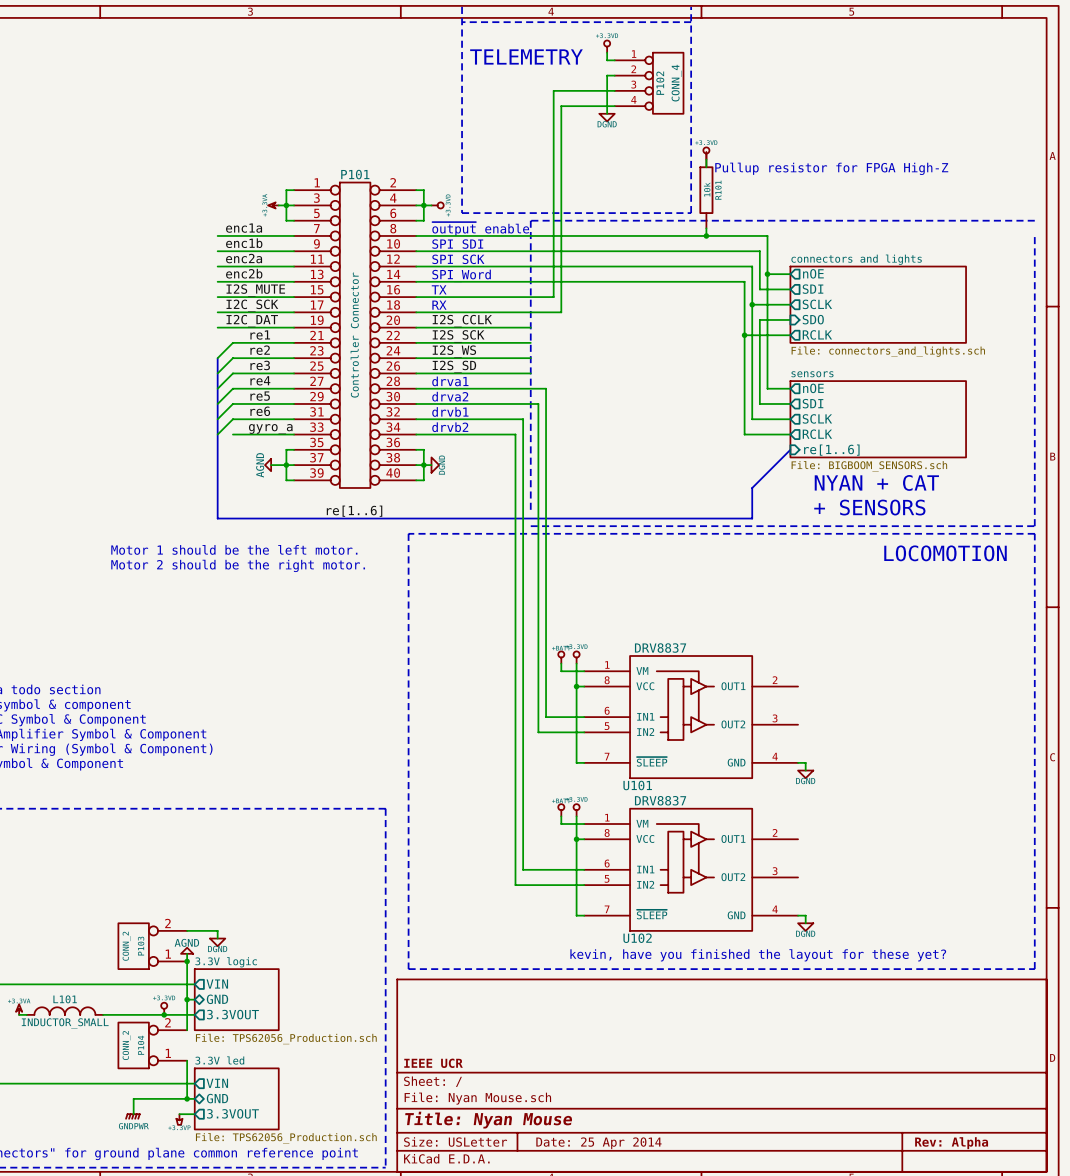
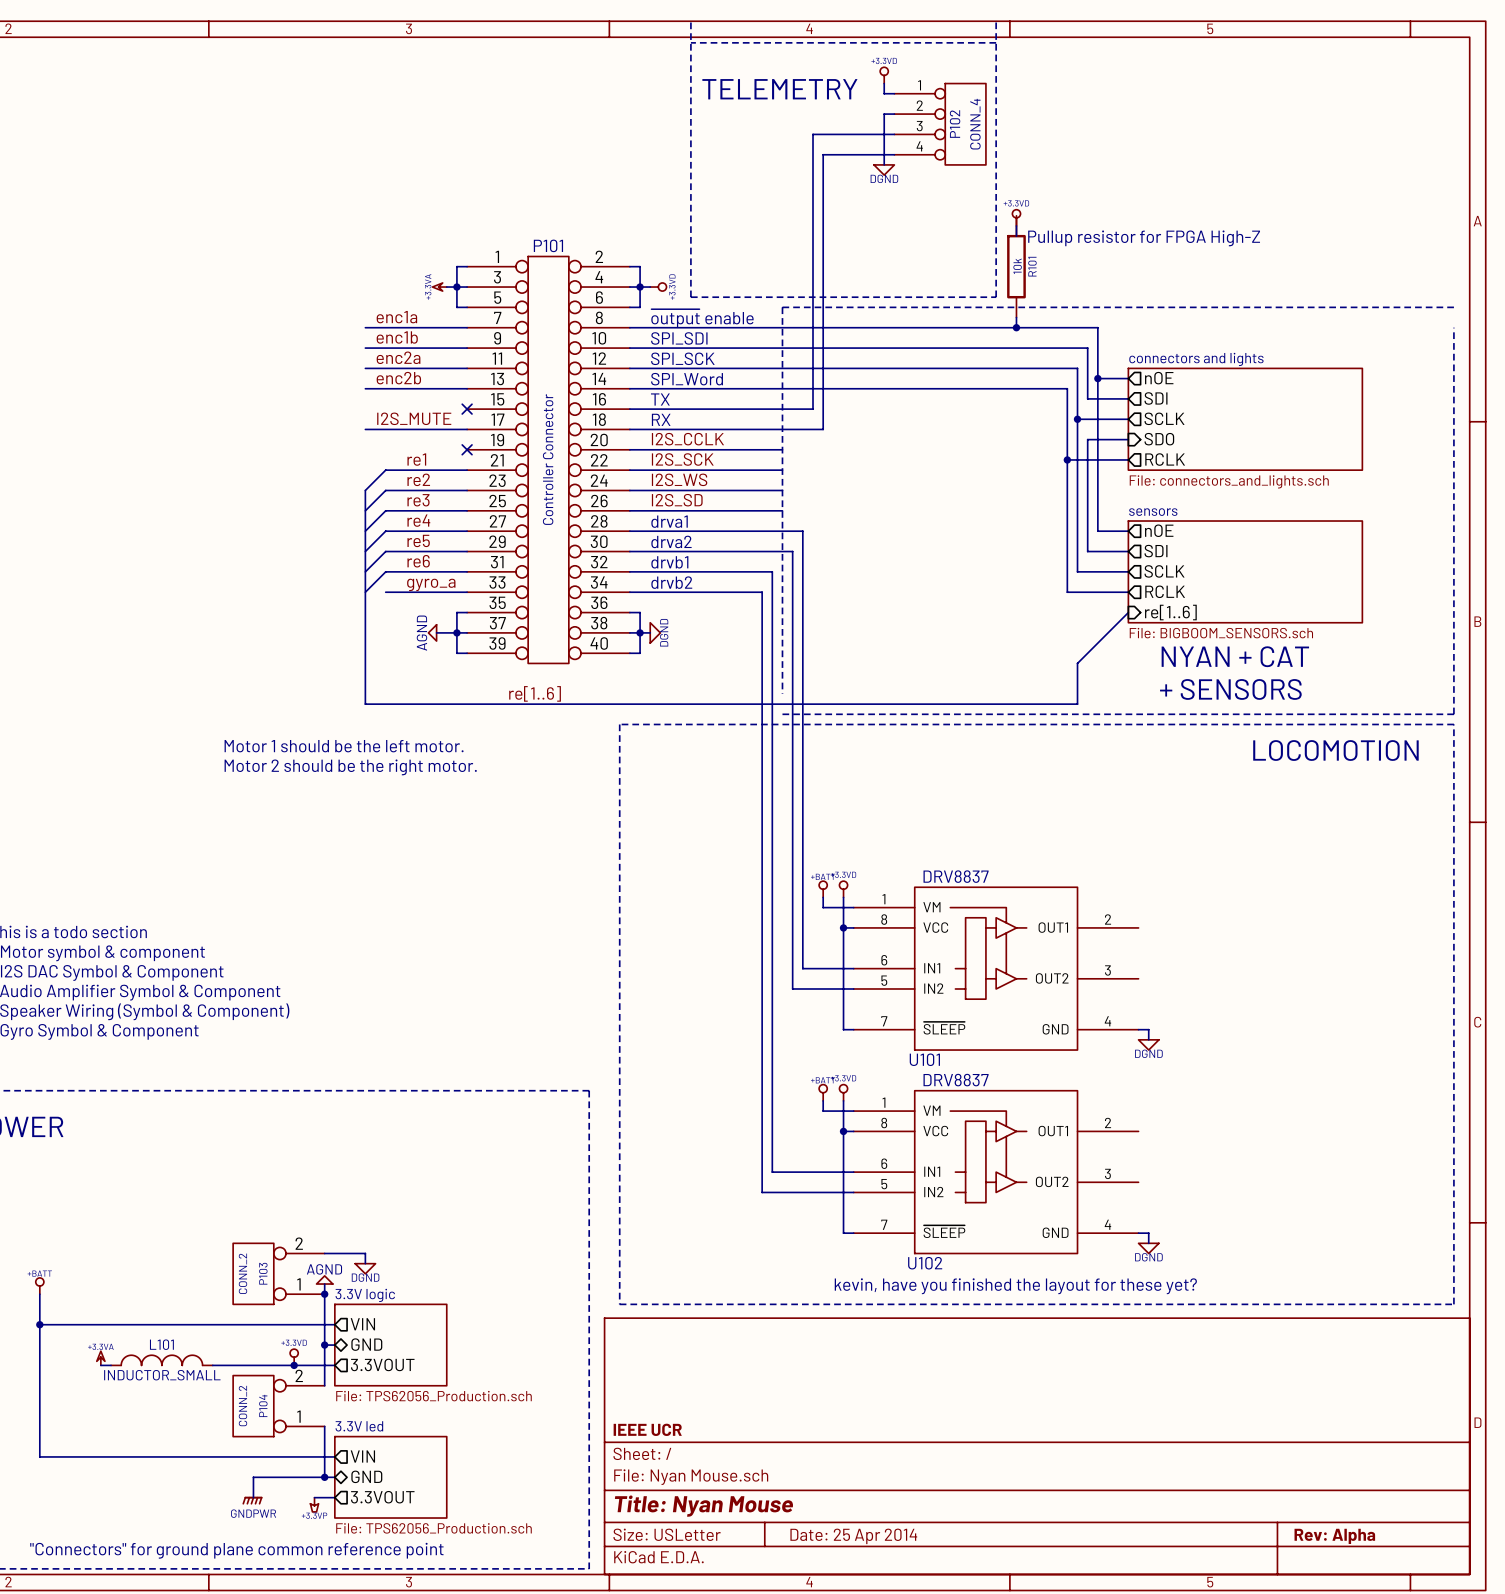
label: I2S_MUTE (255, 290) -> none
wire: (217, 297) (294, 297) -> none
no-connect mark: none -> (467, 409)
label: I2C_SCK (252, 305) -> I2S_MUTE (414, 418)
label: I2C_DAT (252, 321) -> none
wire: (217, 327) (294, 327) -> none
no-connect mark: none -> (467, 449)

